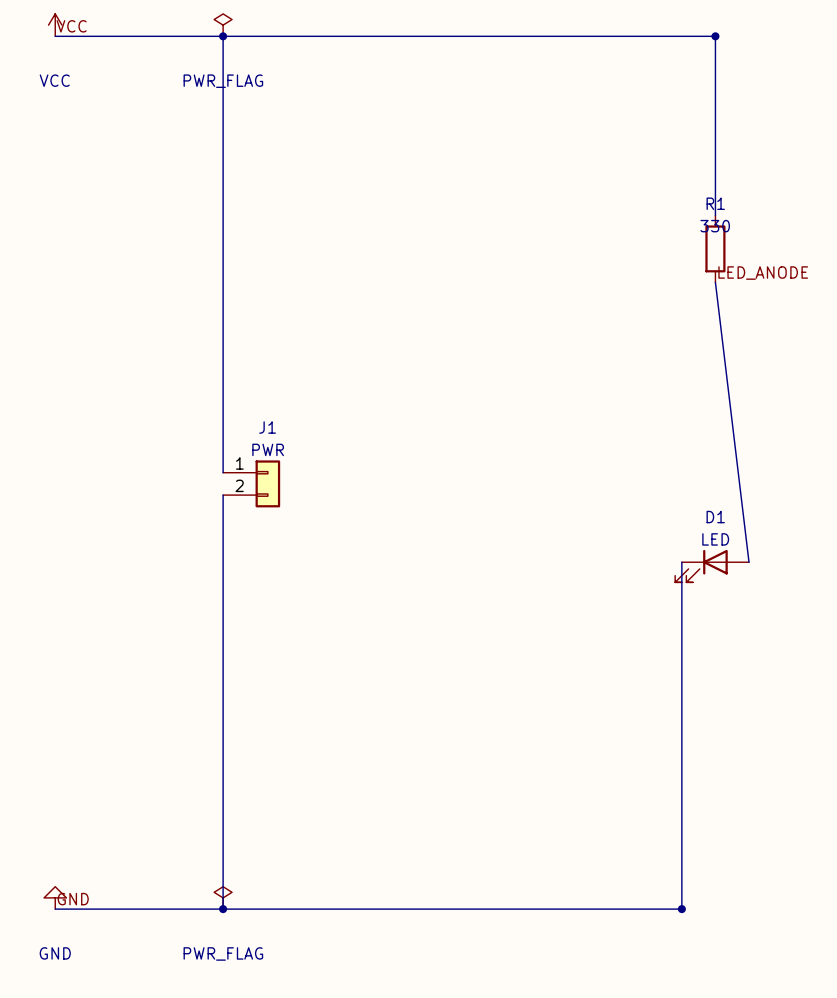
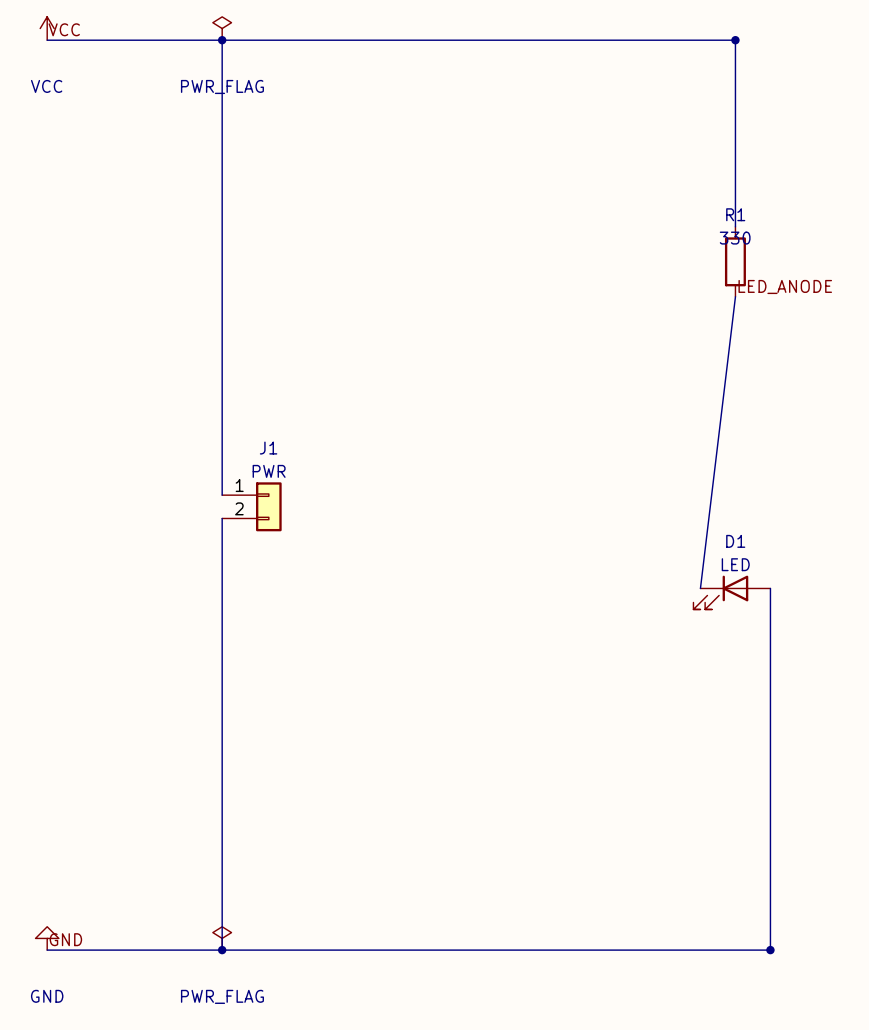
wire: (715, 282) (749, 562) -> (735, 296) (700, 588)
wire: (681, 562) (681, 909) -> (770, 588) (770, 950) (700, 950)
junction: (681, 909) -> none
junction: none -> (770, 950)

